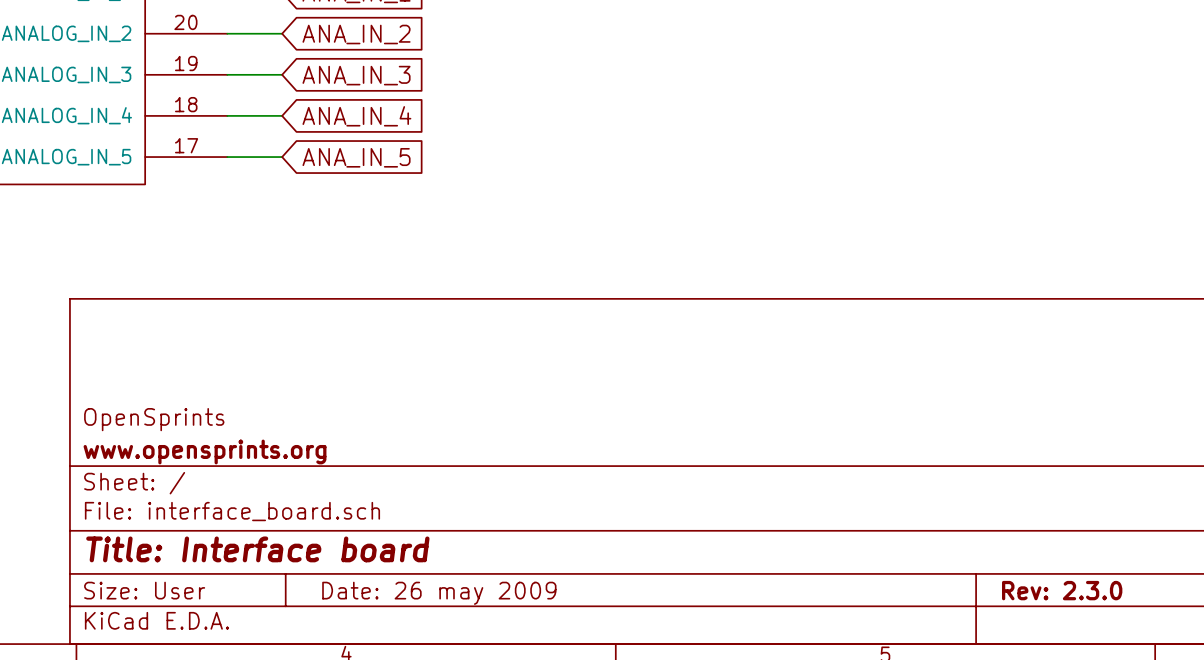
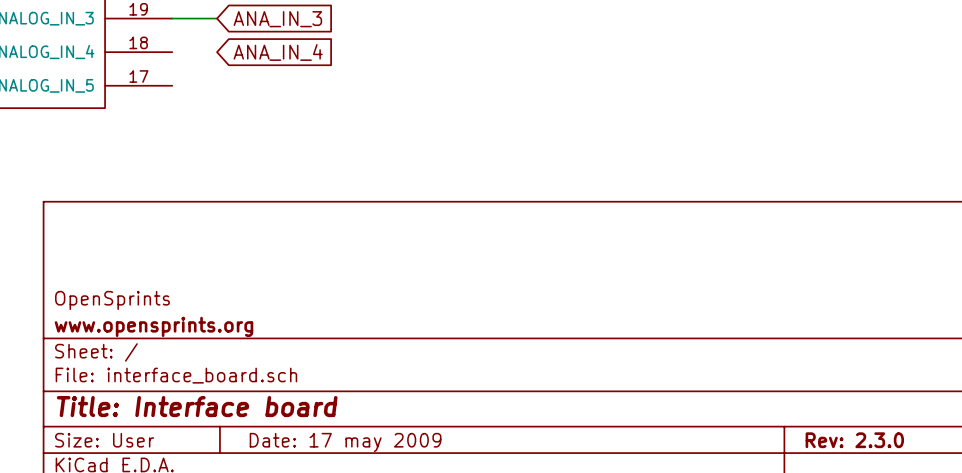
wire: (227, 115) (282, 115) -> none
wire: (227, 157) (282, 157) -> none
global label: ANA_IN_5 (356, 157) -> none
title block: Date: 26 may 2009 (439, 593) -> Date: 17 may 2009 (345, 442)

